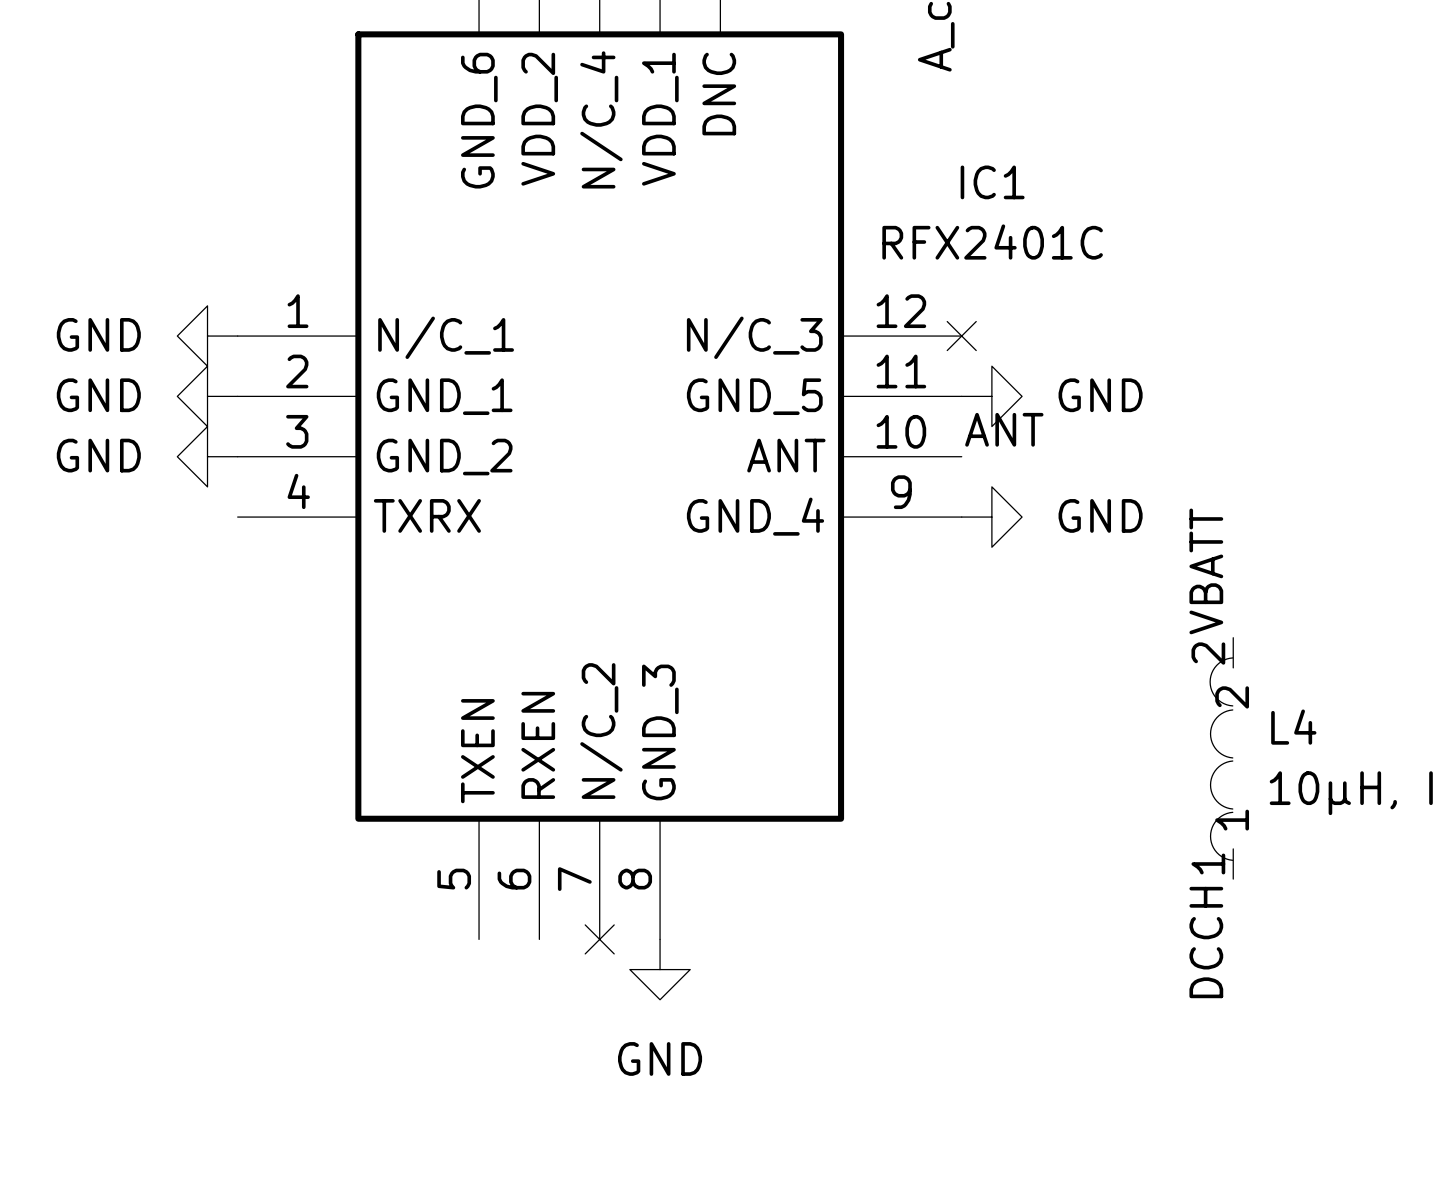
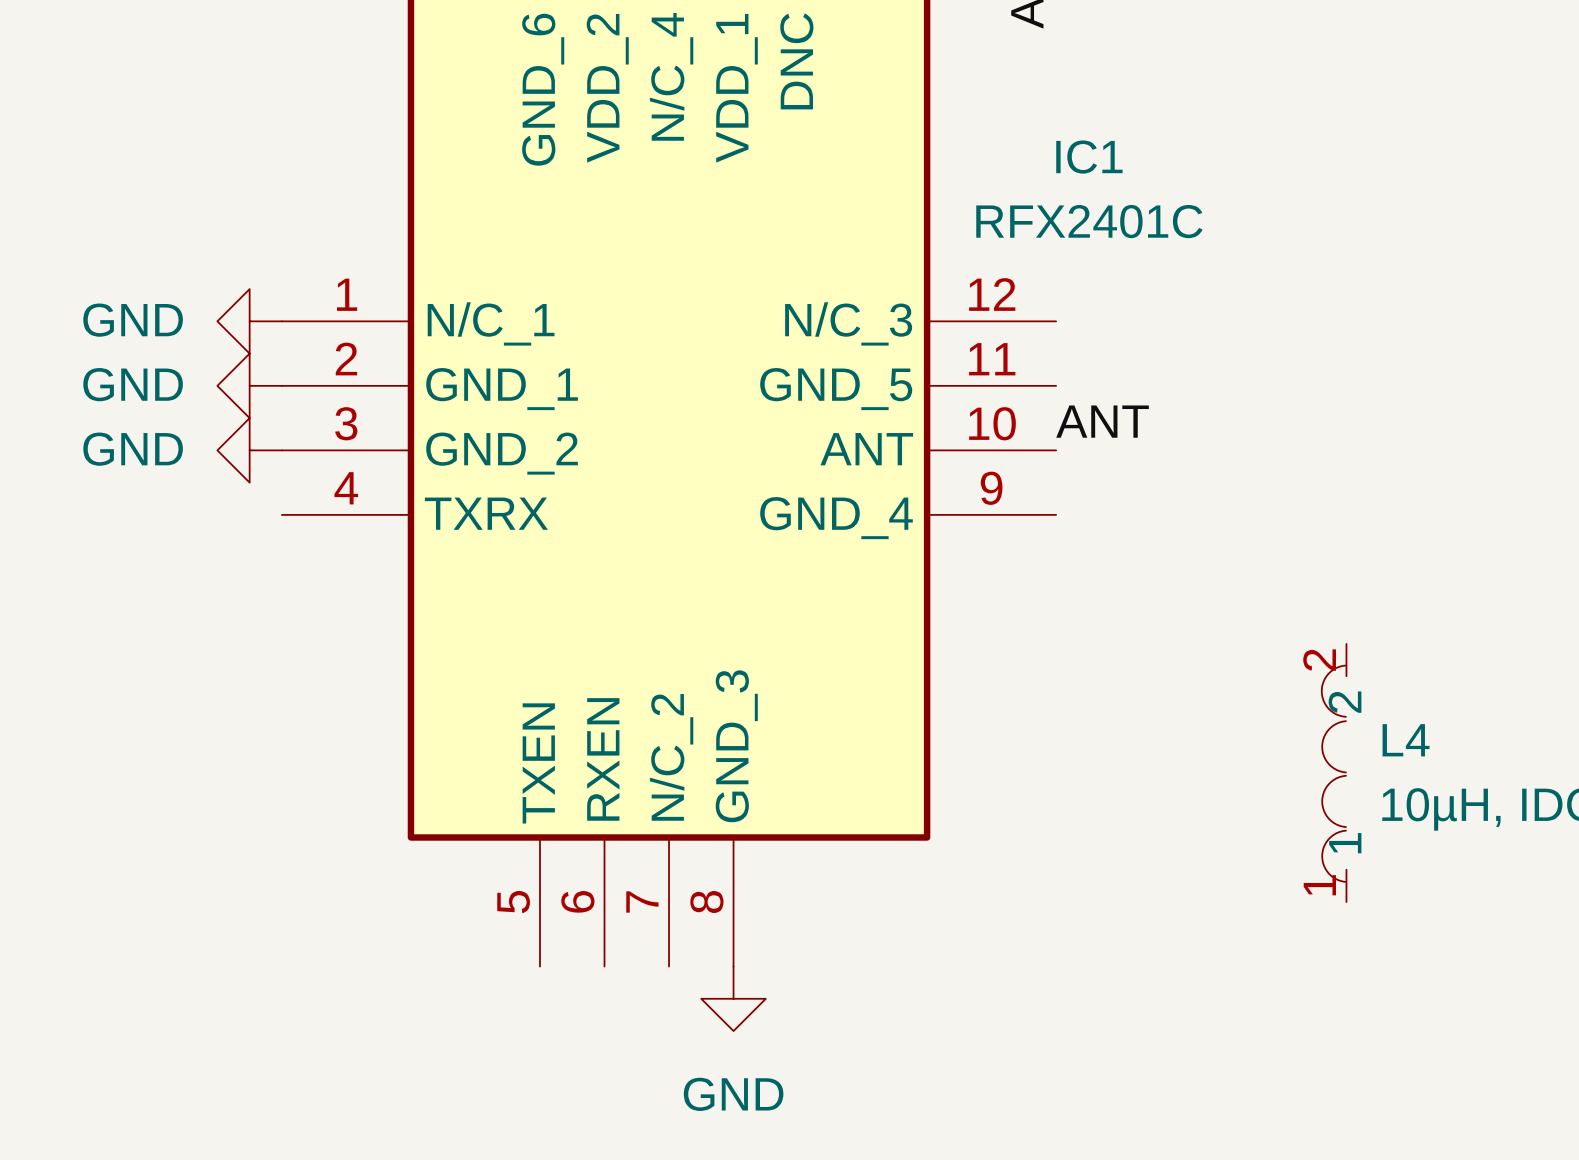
no-connect mark: (961, 336) -> none
power symbol: GND (991, 396) -> none
power symbol: GND (991, 517) -> none
label: VBATT (1206, 571) -> none
no-connect mark: (599, 939) -> none
label: DCCH (1206, 942) -> none

